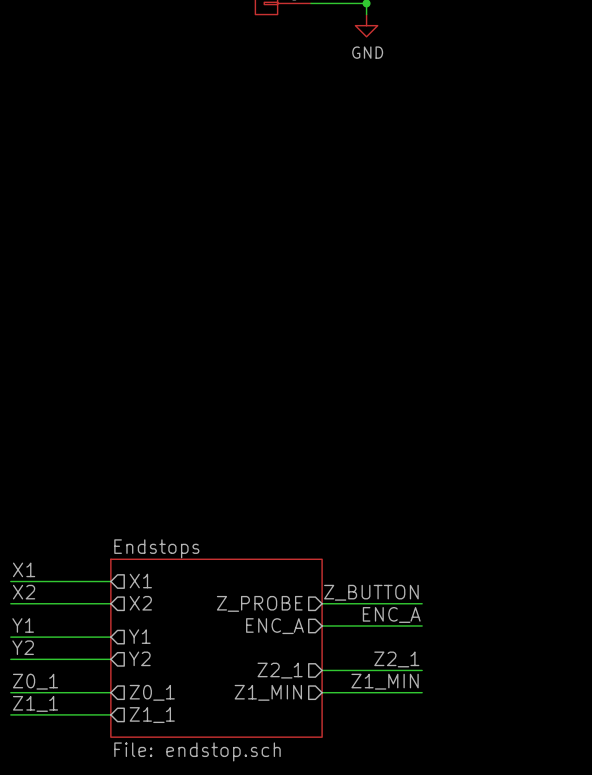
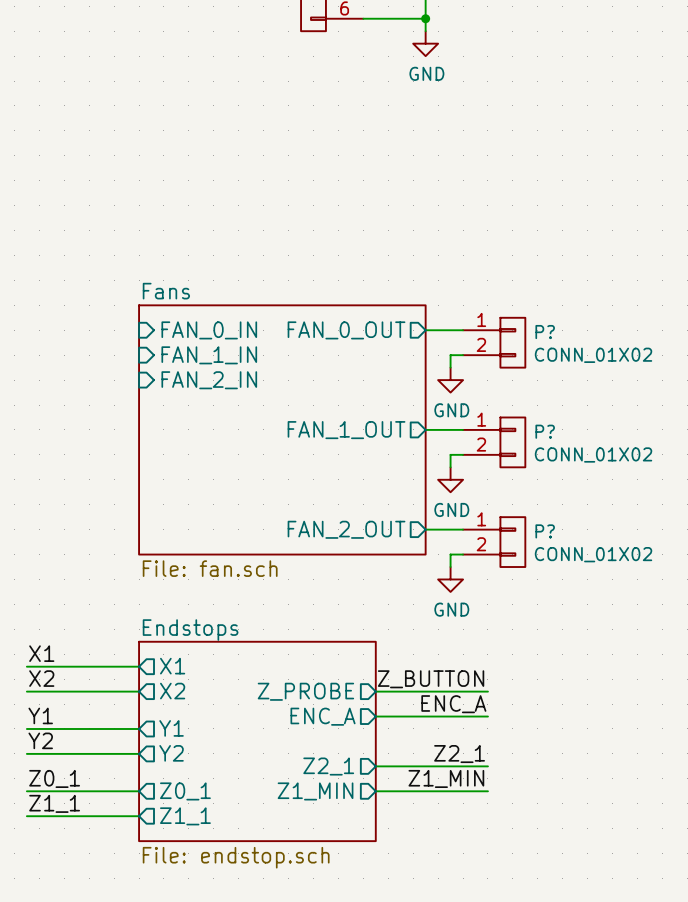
sheet pin: none -> FAN_0_IN (209, 330)
sheet pin: none -> FAN_0_OUT (346, 330)
wire: none -> (425, 330) (463, 330)
P?: none -> CONN_01X02 (494, 342)
sheet pin: none -> FAN_1_IN (209, 355)
wire: none -> (463, 355) (450, 355) (450, 367)
sheet pin: none -> FAN_2_IN (209, 380)
power symbol: none -> GND (450, 380)
sheet Fans: none -> File: fan.sch (282, 429)
sheet pin: none -> FAN_1_OUT (346, 430)
wire: none -> (425, 429) (463, 429)
P?: none -> CONN_01X02 (494, 442)
wire: none -> (463, 454) (450, 454) (450, 467)
power symbol: none -> GND (450, 479)
sheet pin: none -> FAN_2_OUT (346, 529)
wire: none -> (425, 529) (463, 529)
P?: none -> CONN_01X02 (494, 542)
wire: none -> (463, 554) (450, 554) (450, 567)
power symbol: none -> GND (450, 579)

